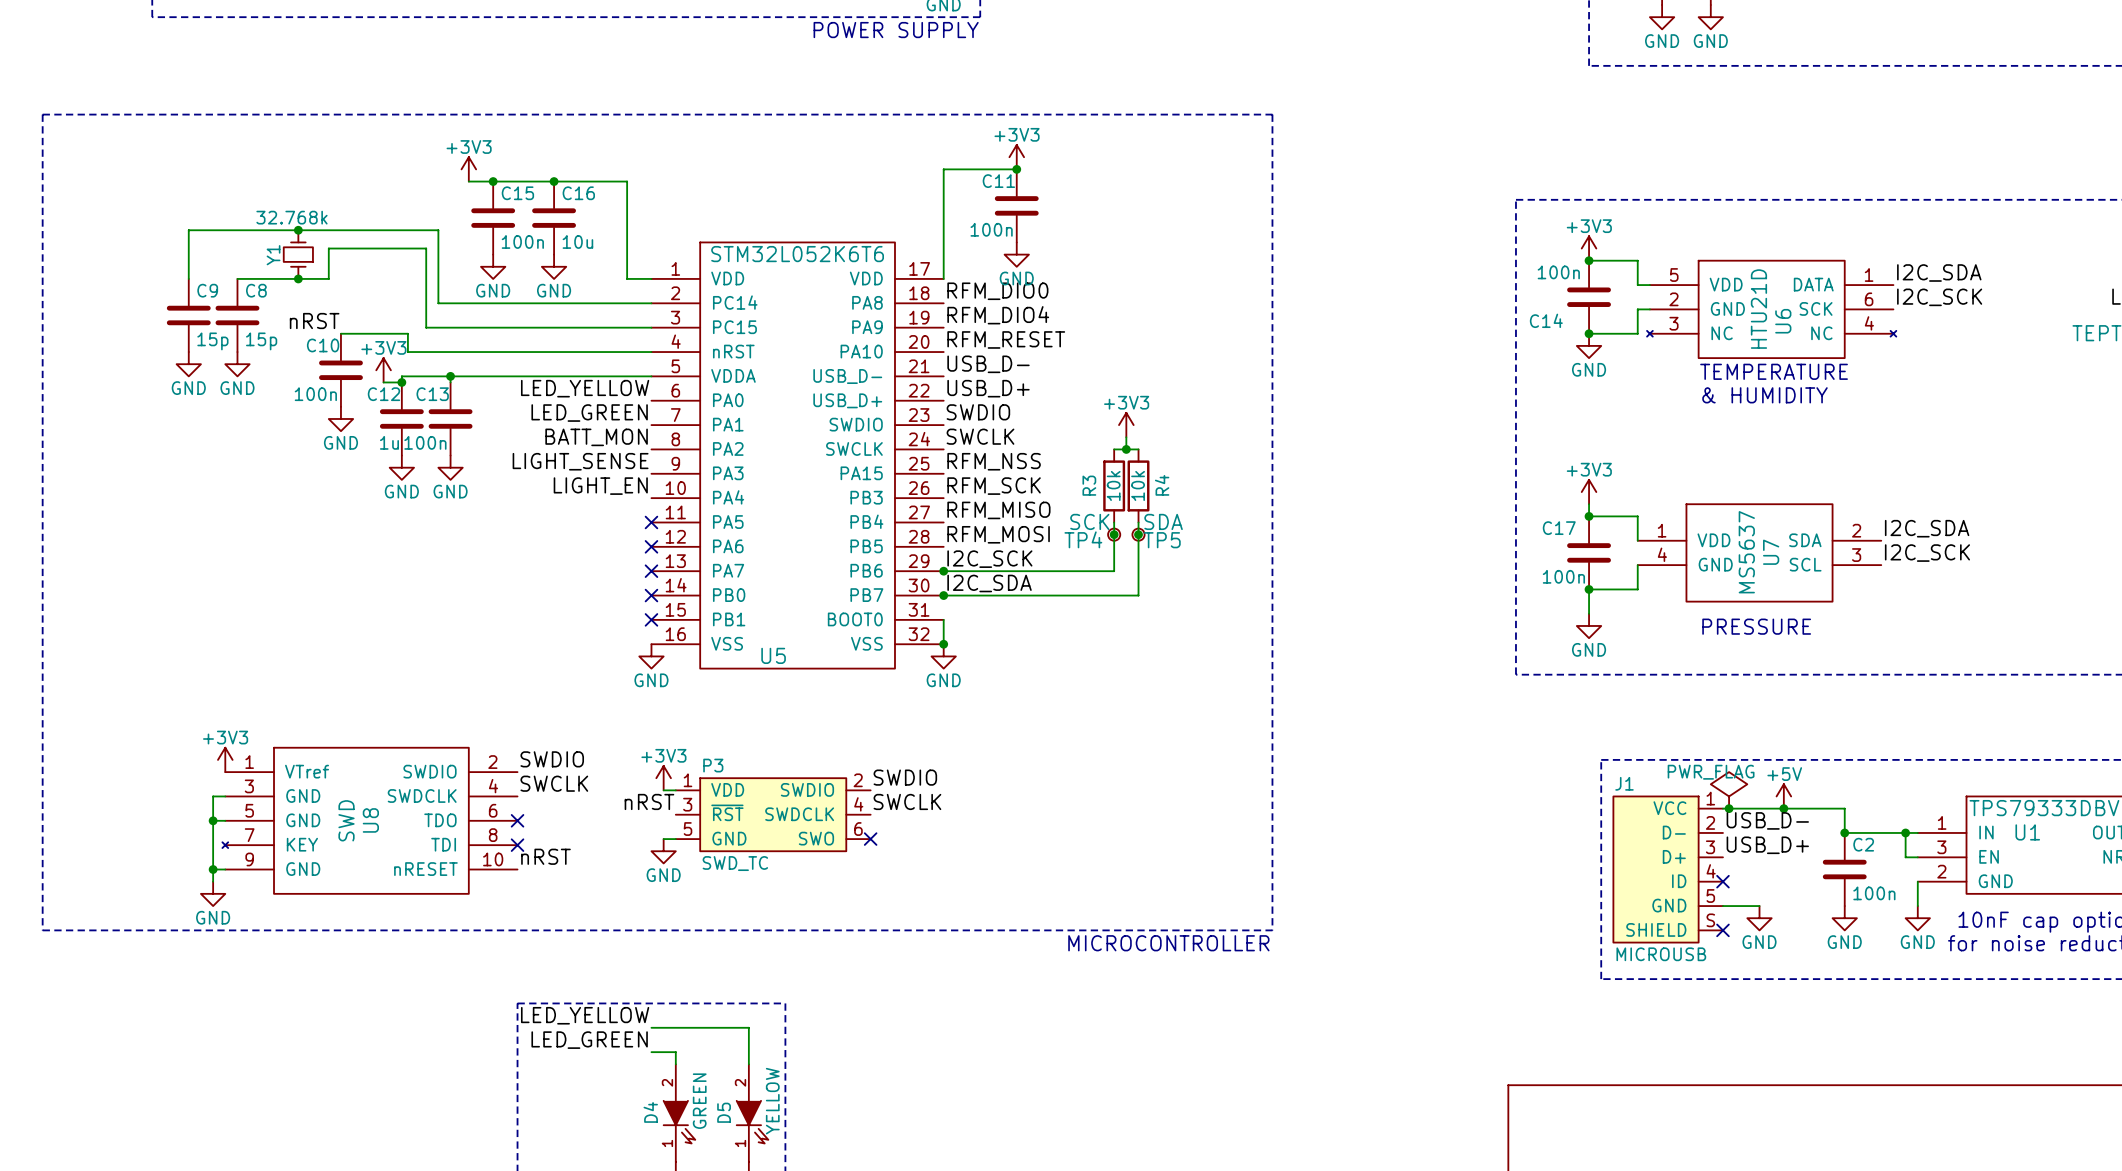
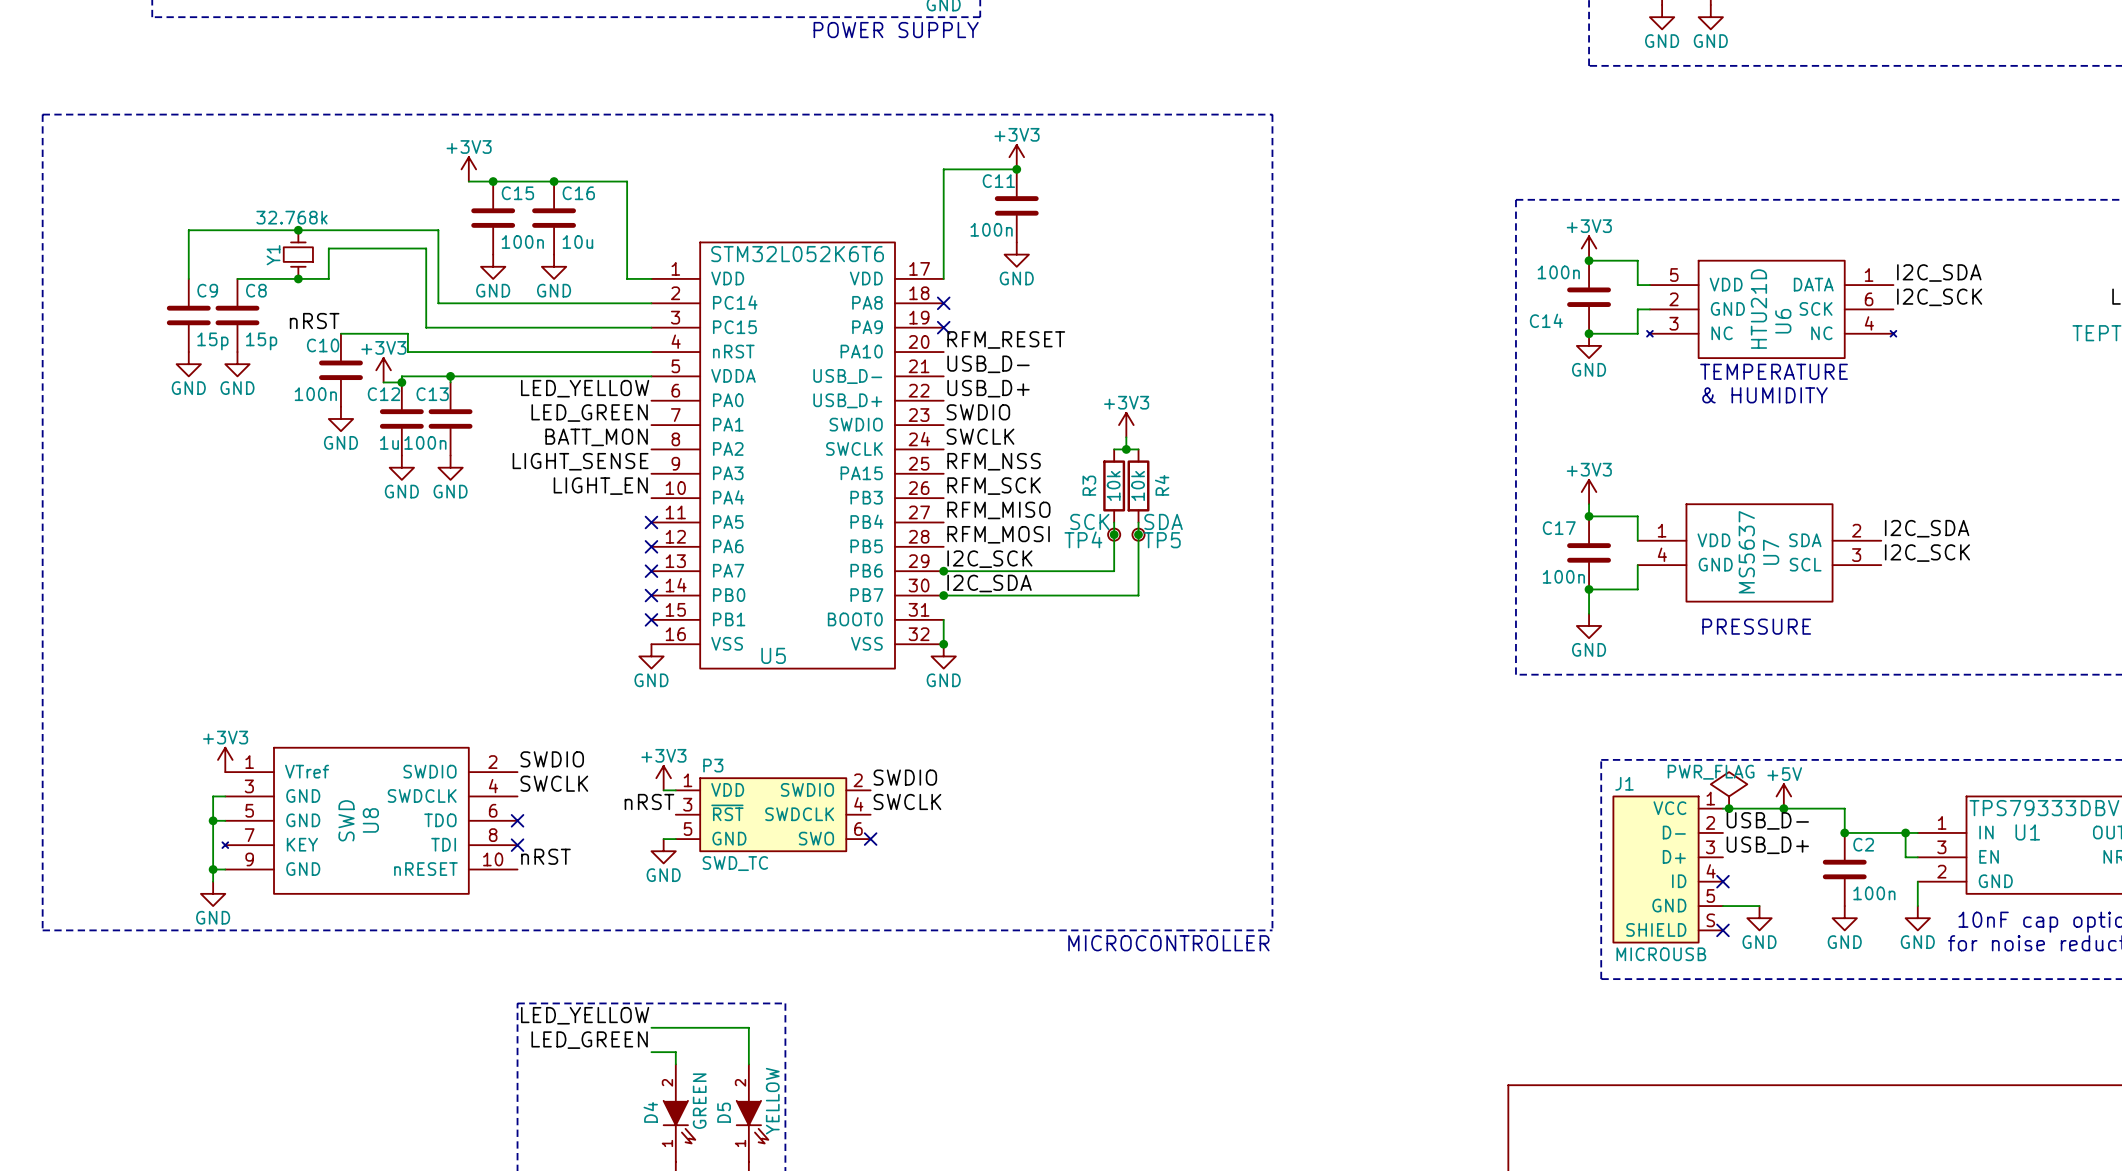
label: RFM_DIO0 (997, 291) -> none
no-connect mark: none -> (943, 303)
label: RFM_DIO4 (998, 315) -> none
no-connect mark: none -> (943, 327)

